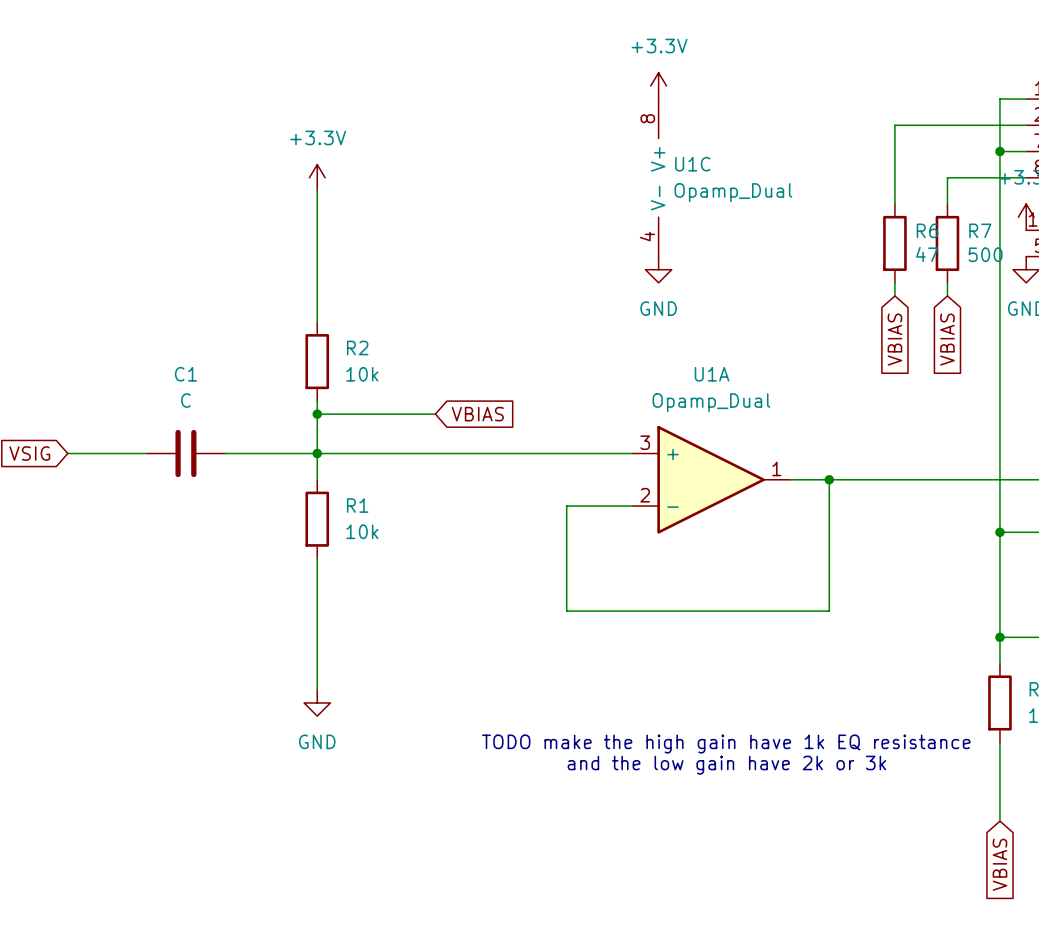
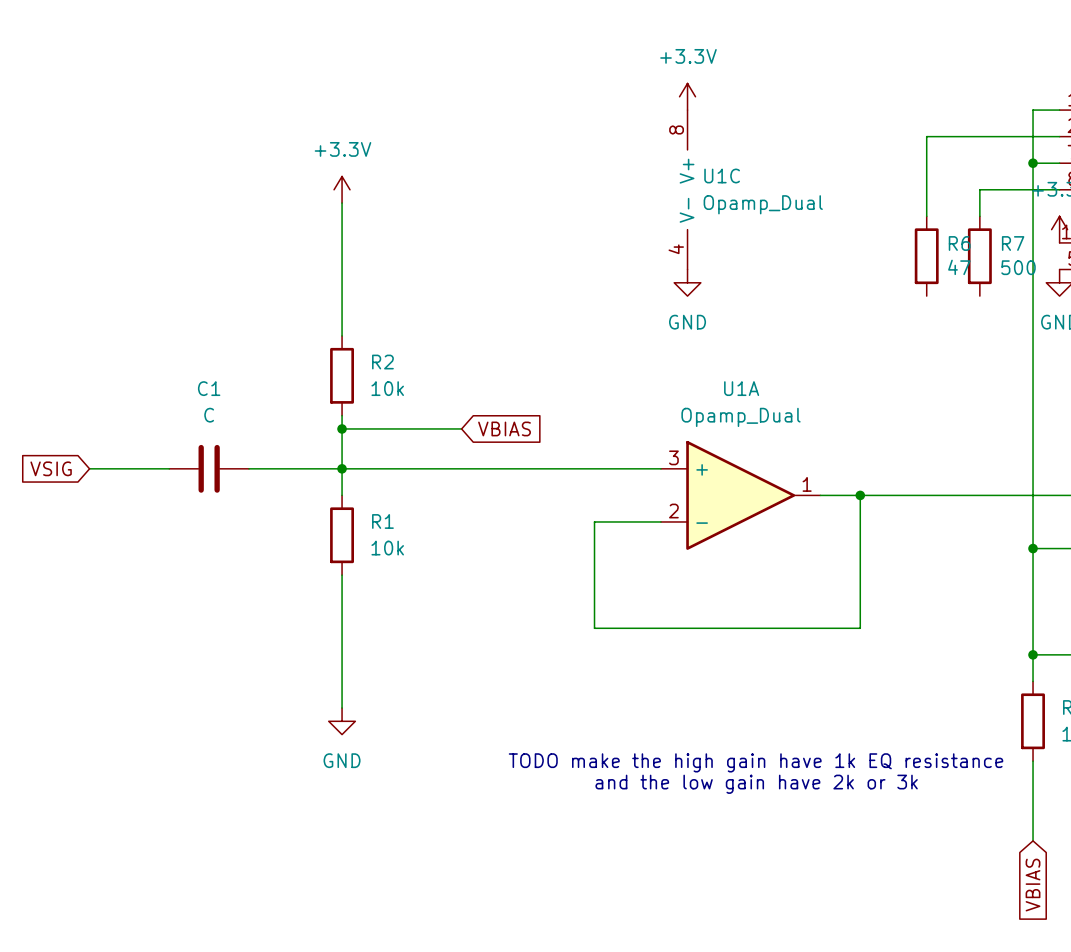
wire: (894, 282) (894, 295) -> none
wire: (947, 282) (947, 295) -> none
global label: VBIAS (894, 339) -> none
global label: VBIAS (947, 339) -> none

